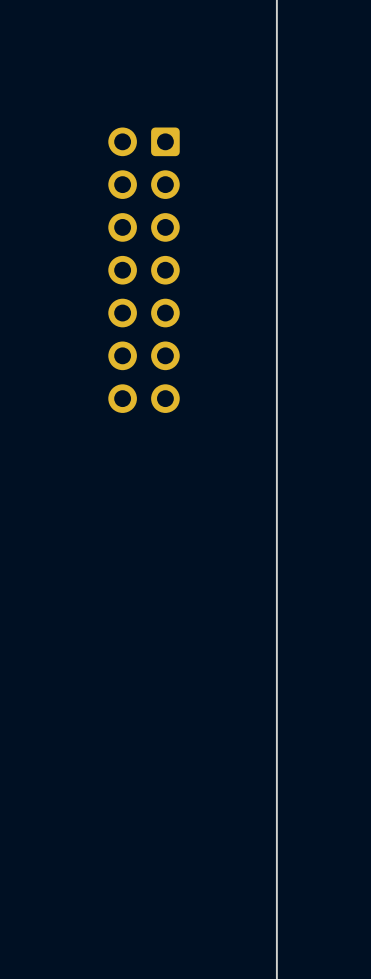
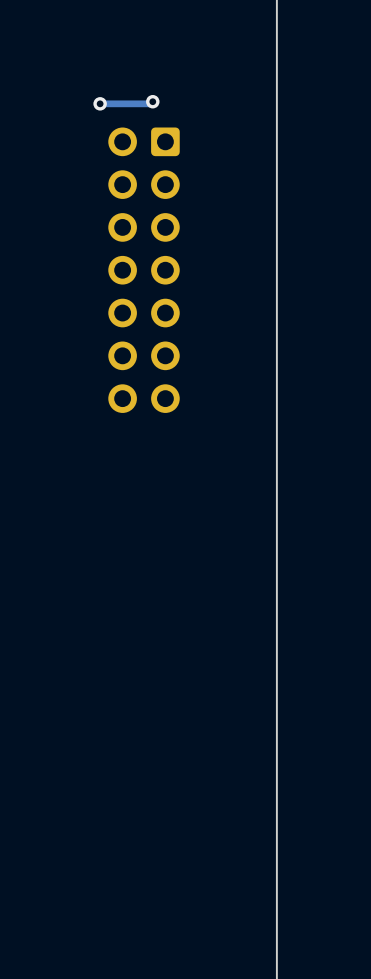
track: none -> (152, 101) (150, 103) (100, 103)
via: none -> (152, 101)
via: none -> (100, 103)

